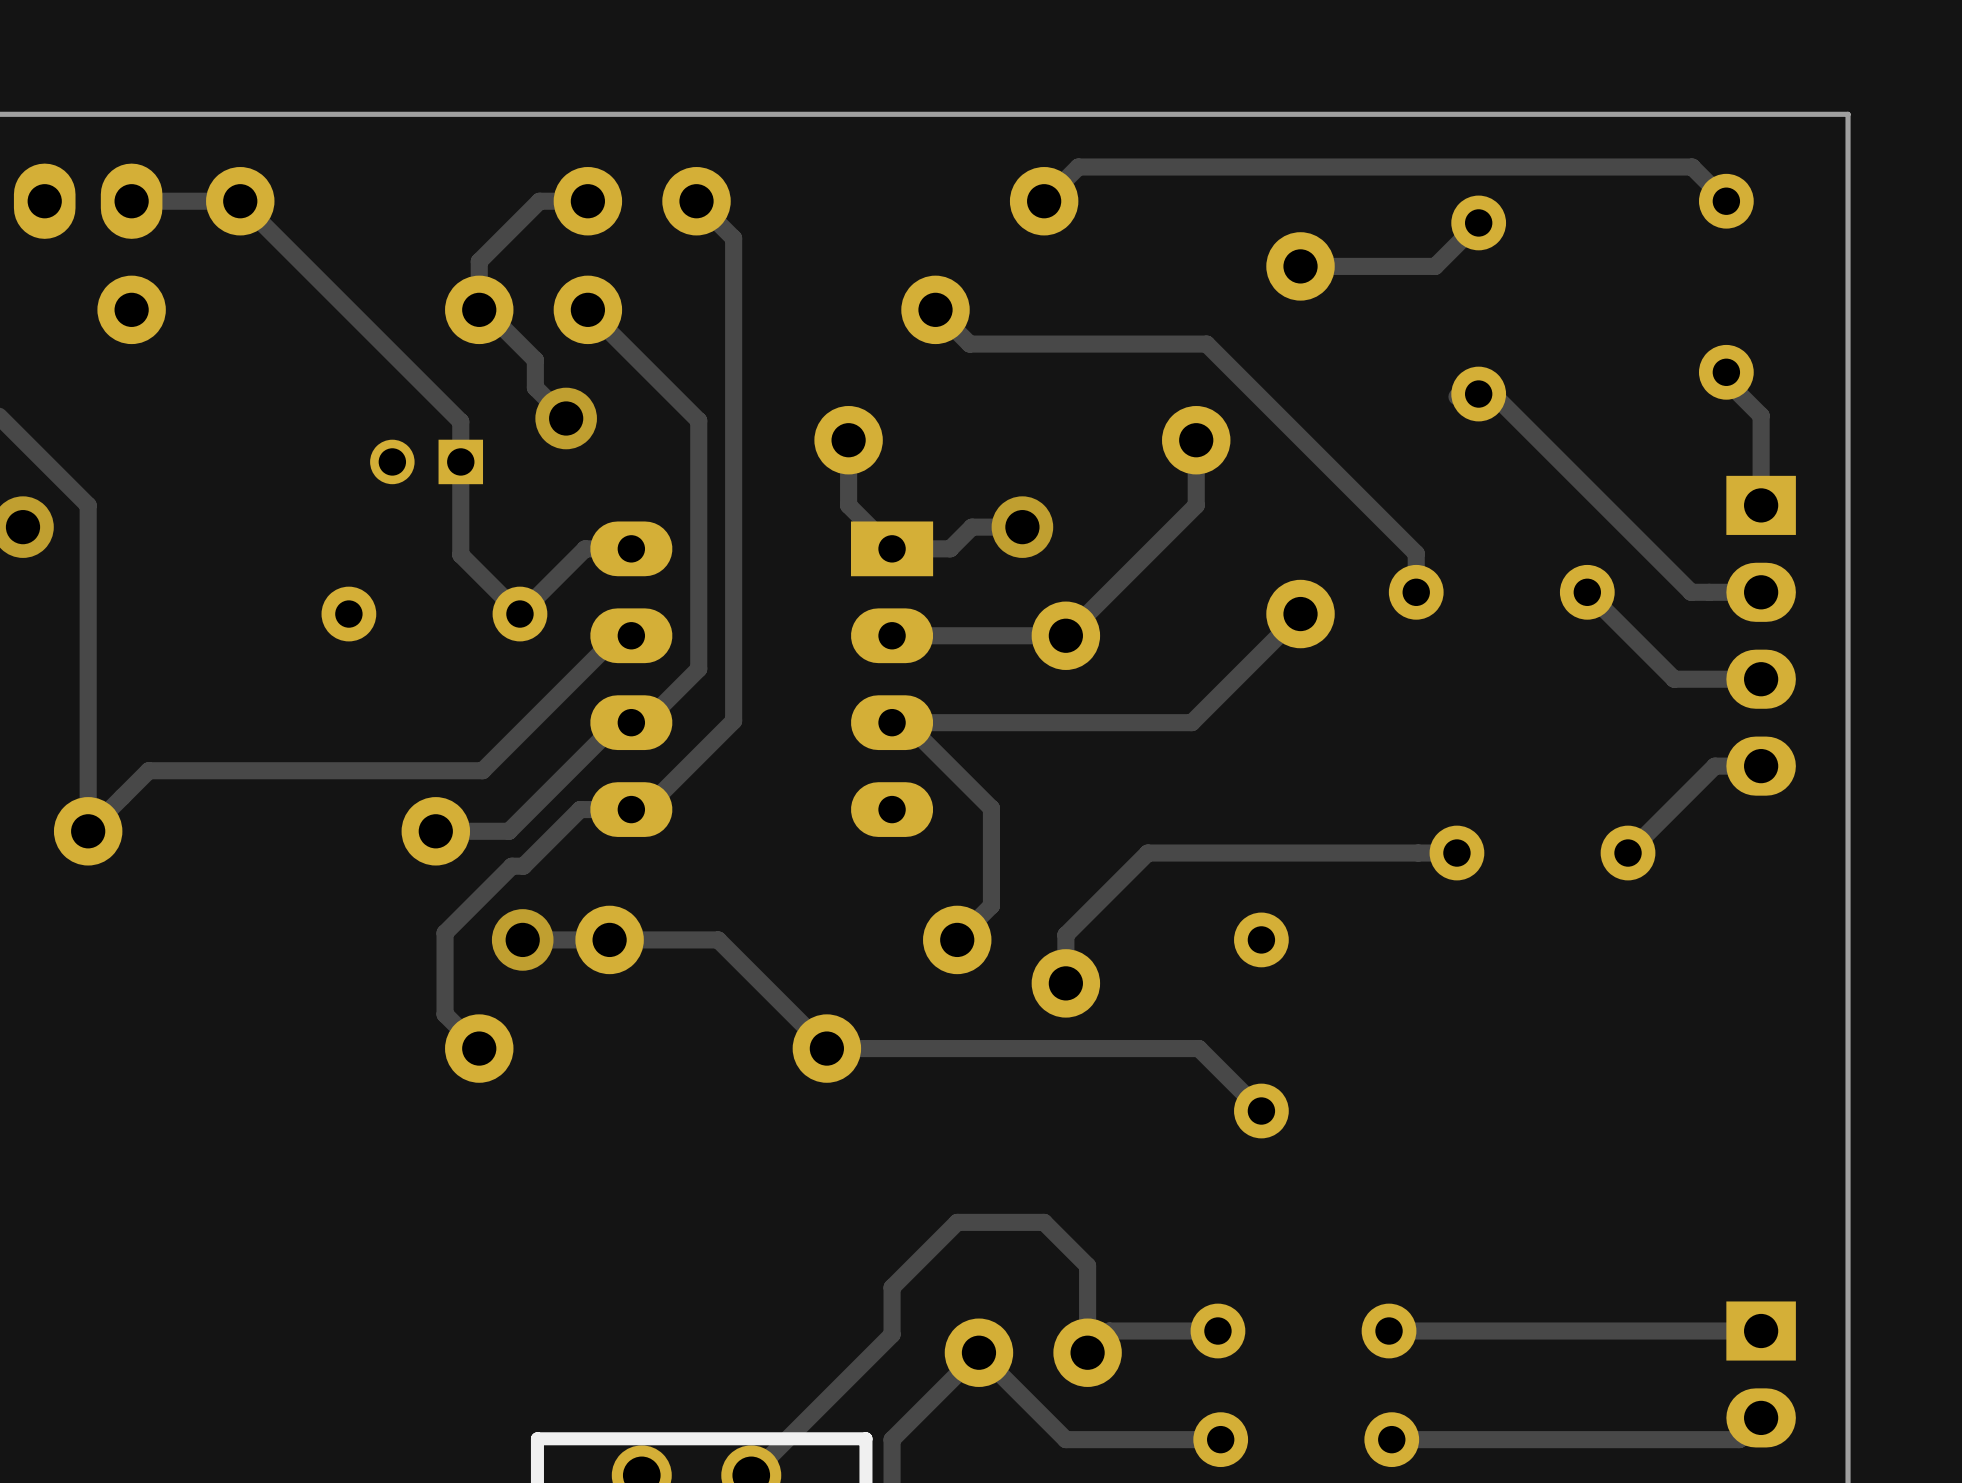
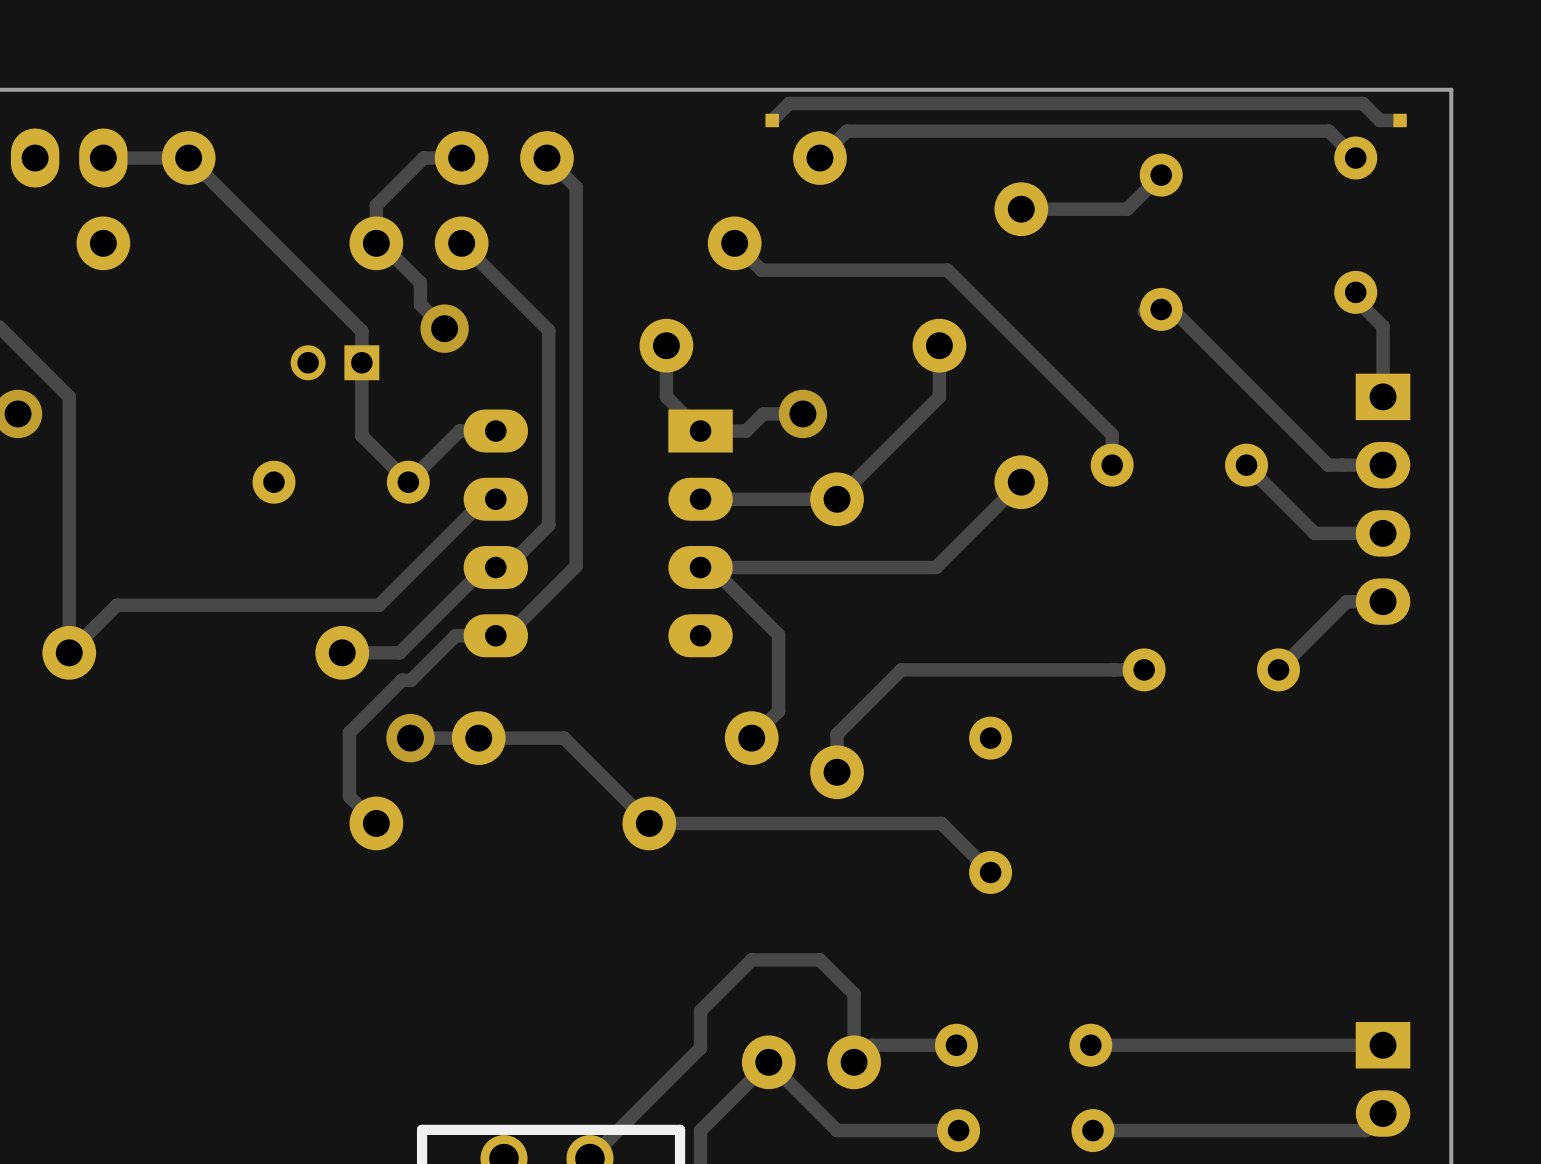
part: none -> (772, 120)
track: none -> (1400, 120) (1379, 120) (1362, 103) (789, 103) (772, 120)
part: none -> (1400, 120)

